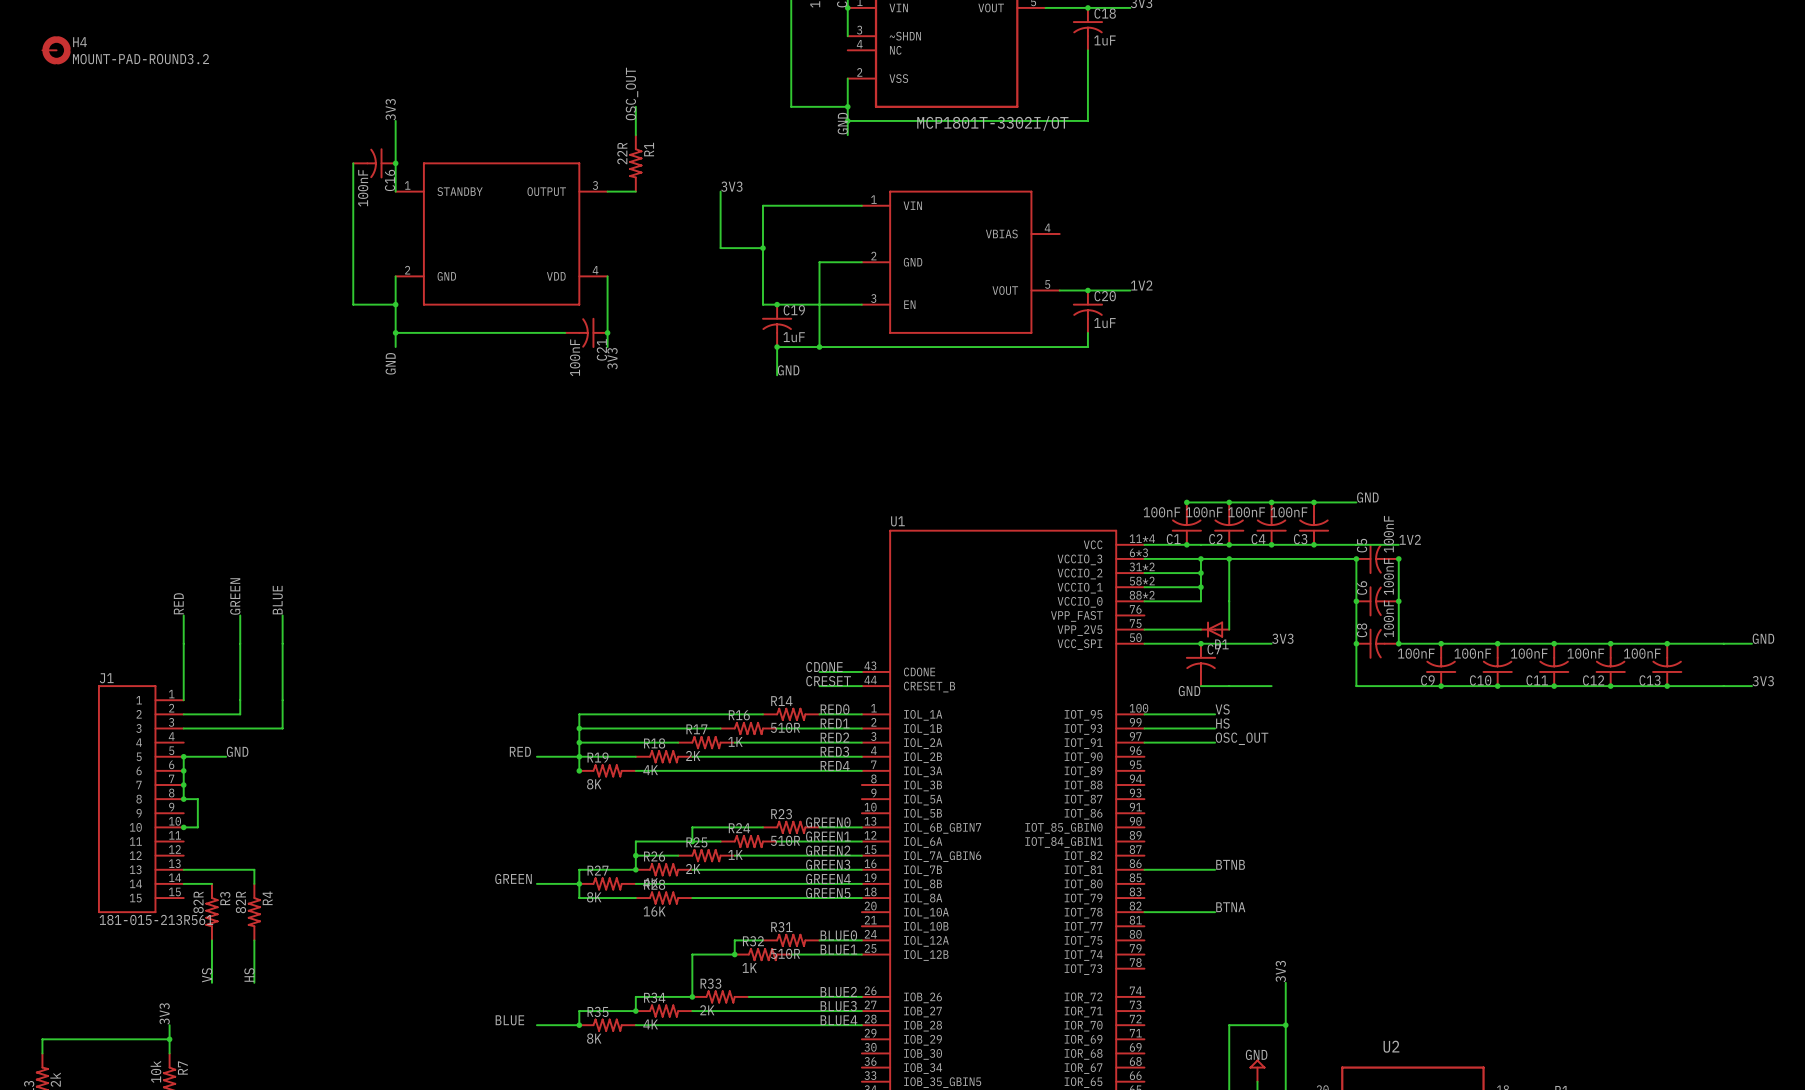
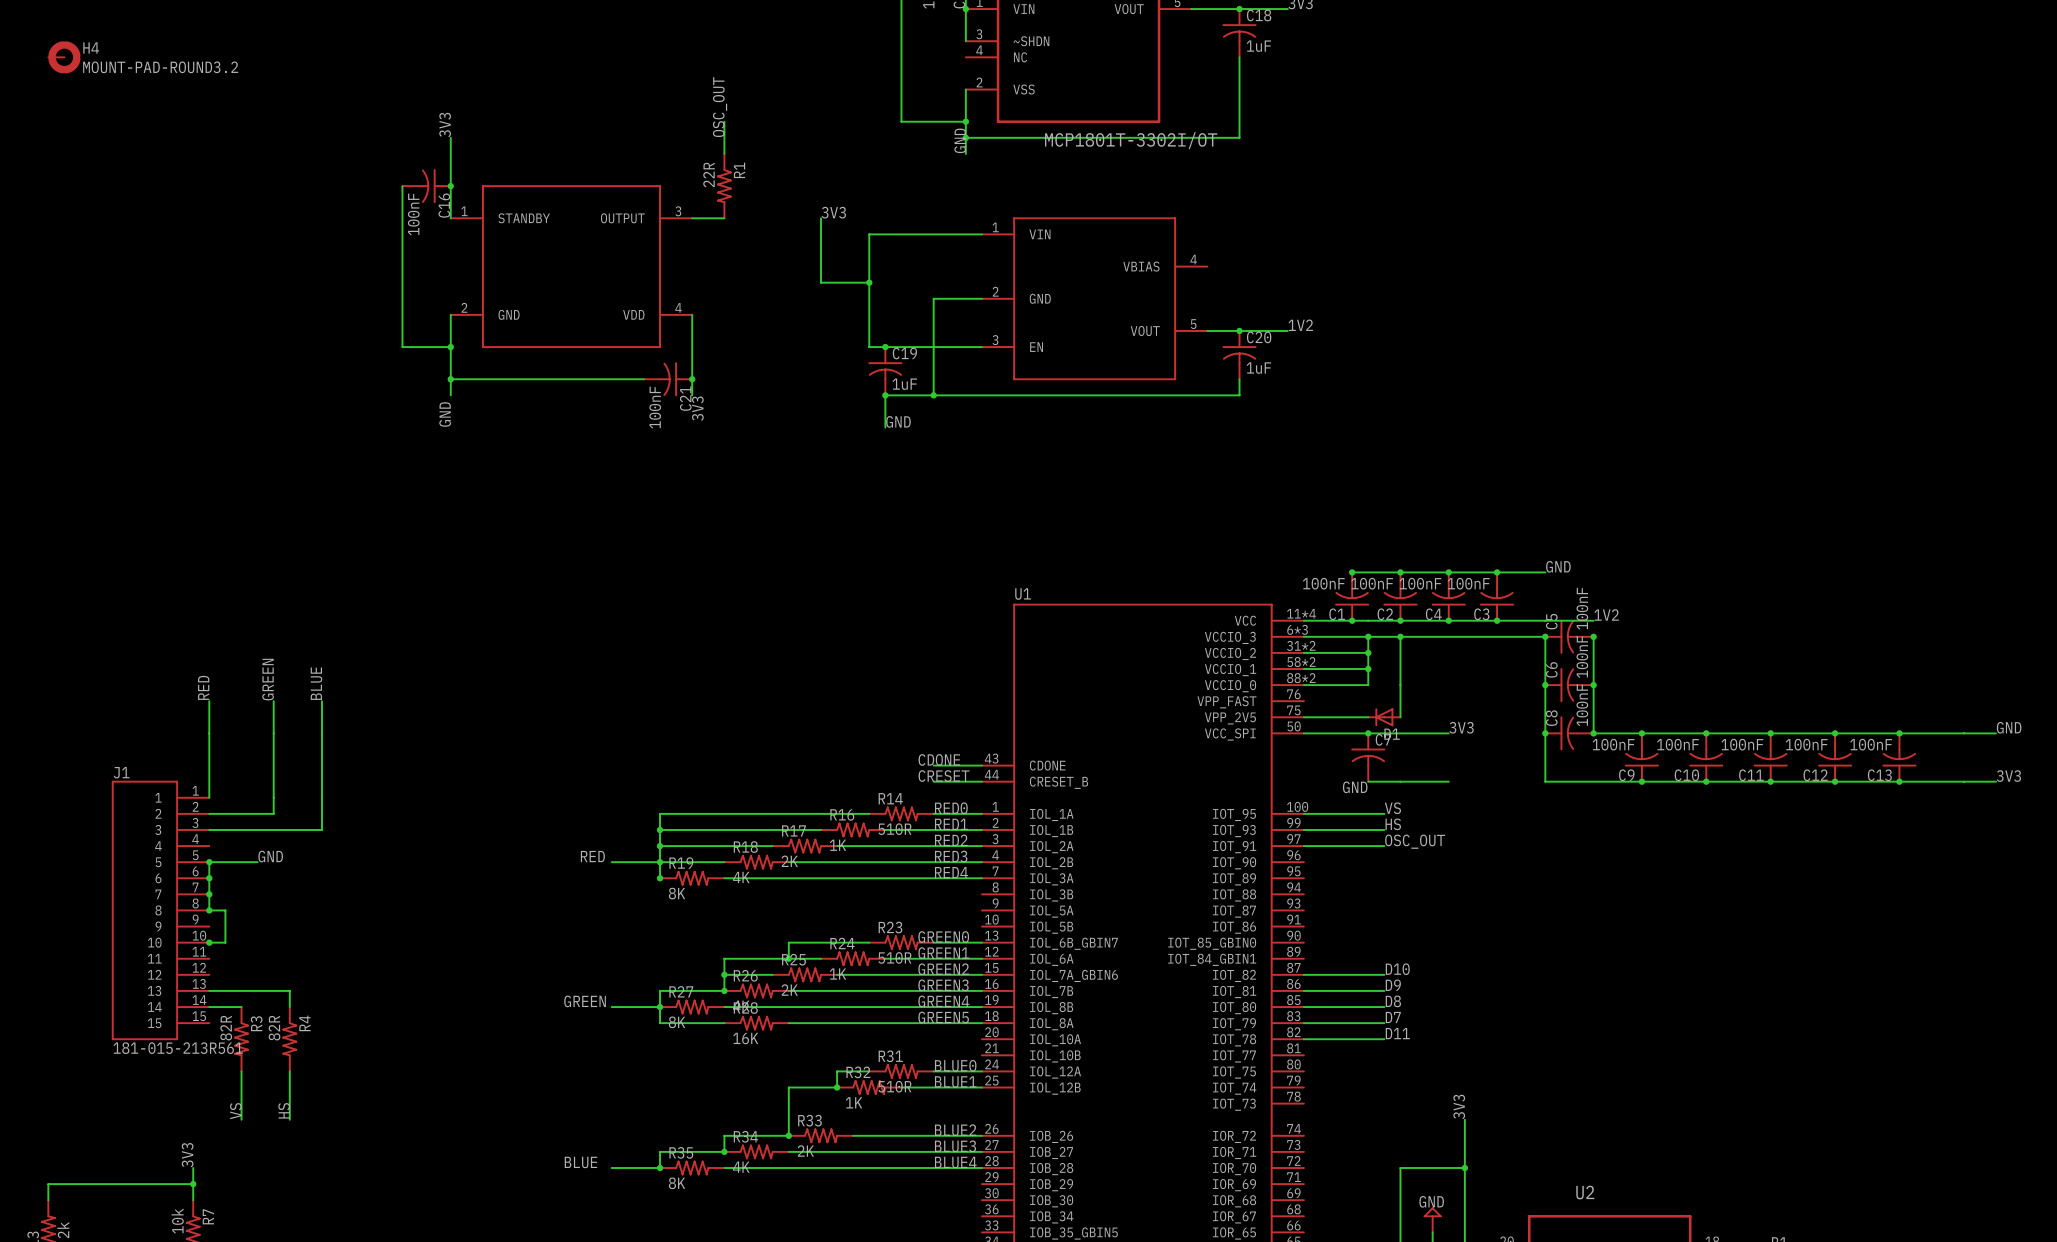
label: none -> D10 (1397, 969)
wire: none -> (1303, 974) (1384, 974)
label: BTNB (1230, 864) -> D9 (1393, 985)
label: none -> D8 (1393, 1001)
wire: none -> (1303, 1007) (1384, 1007)
label: none -> D7 (1393, 1017)
wire: none -> (1303, 1023) (1384, 1023)
label: BTNA (1230, 907) -> D11 (1397, 1033)

